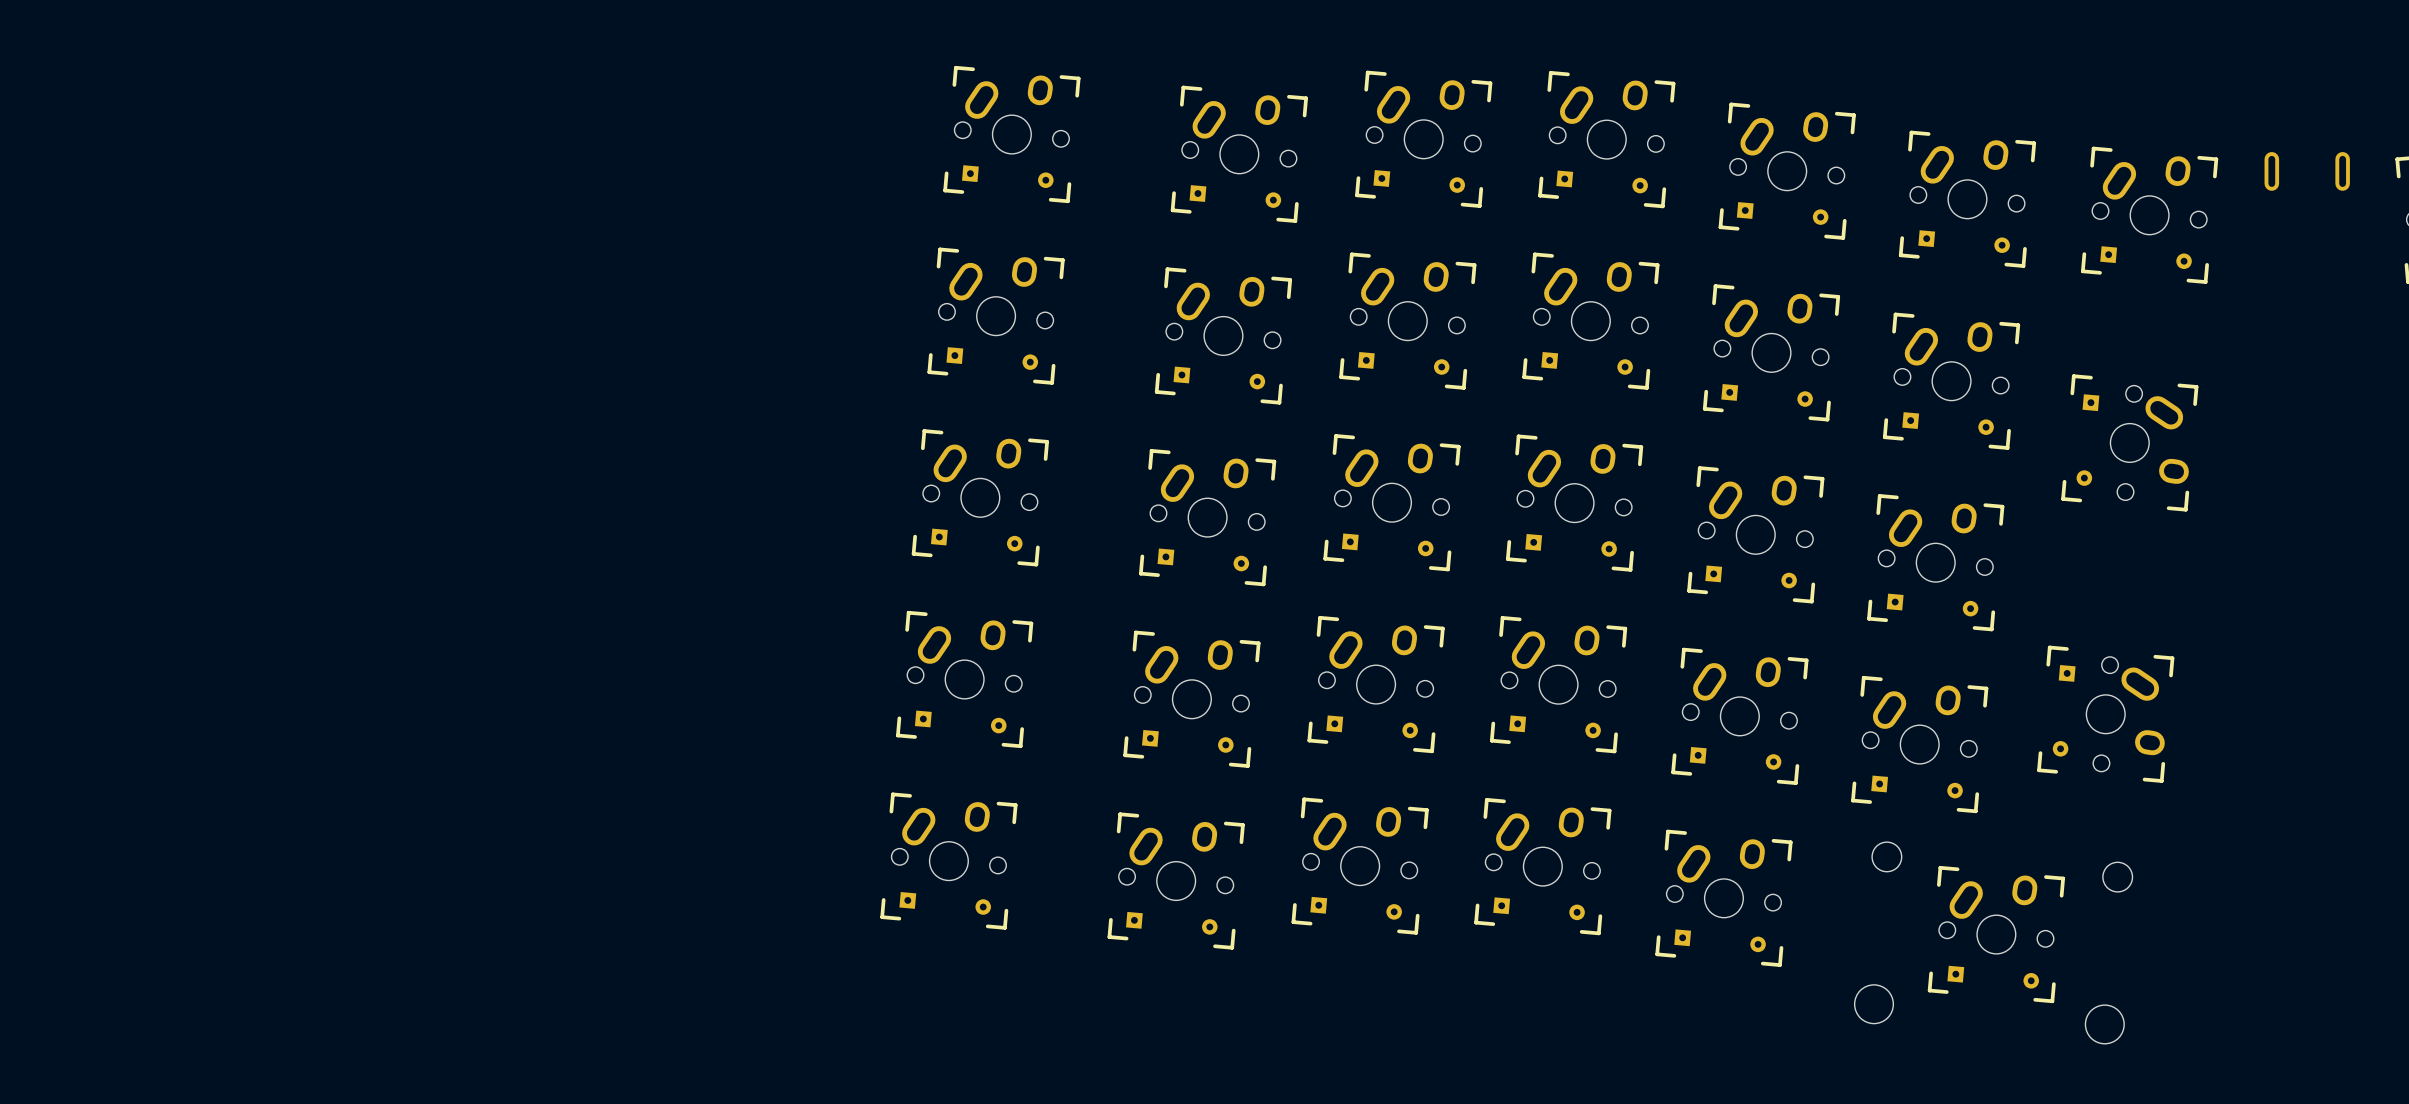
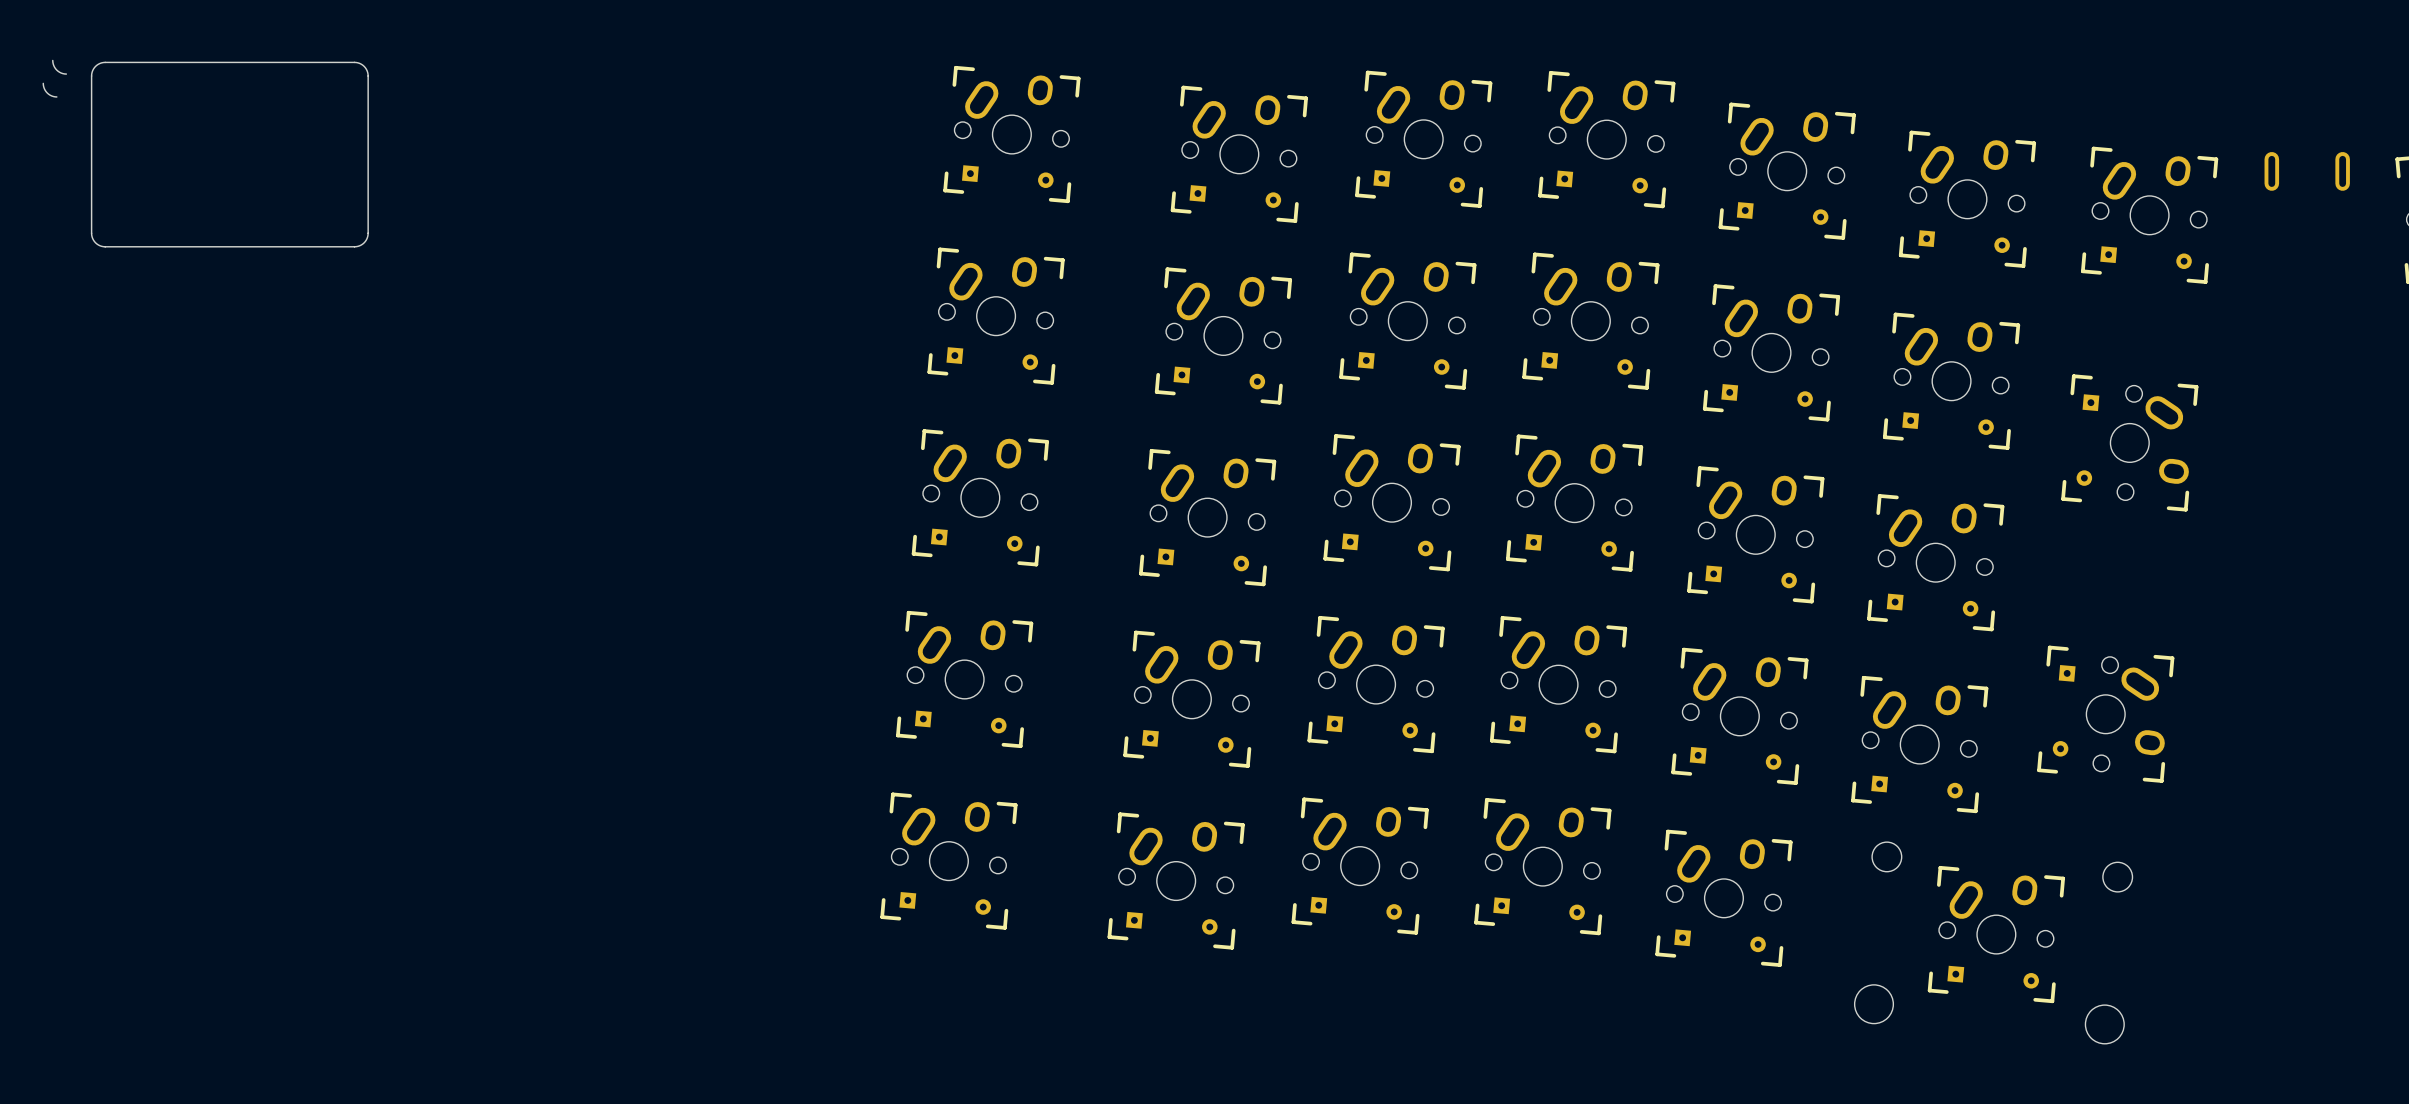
board edge: none -> (52, 60) (56, 70) (66, 74)
board edge: none -> (105, 62) (354, 62) (362, 65) (368, 76) (368, 233) (365, 241) (354, 246) (105, 246) (96, 243) (91, 233) (91, 76) (95, 66) (105, 62)
board edge: none -> (43, 83) (47, 92) (56, 96)

